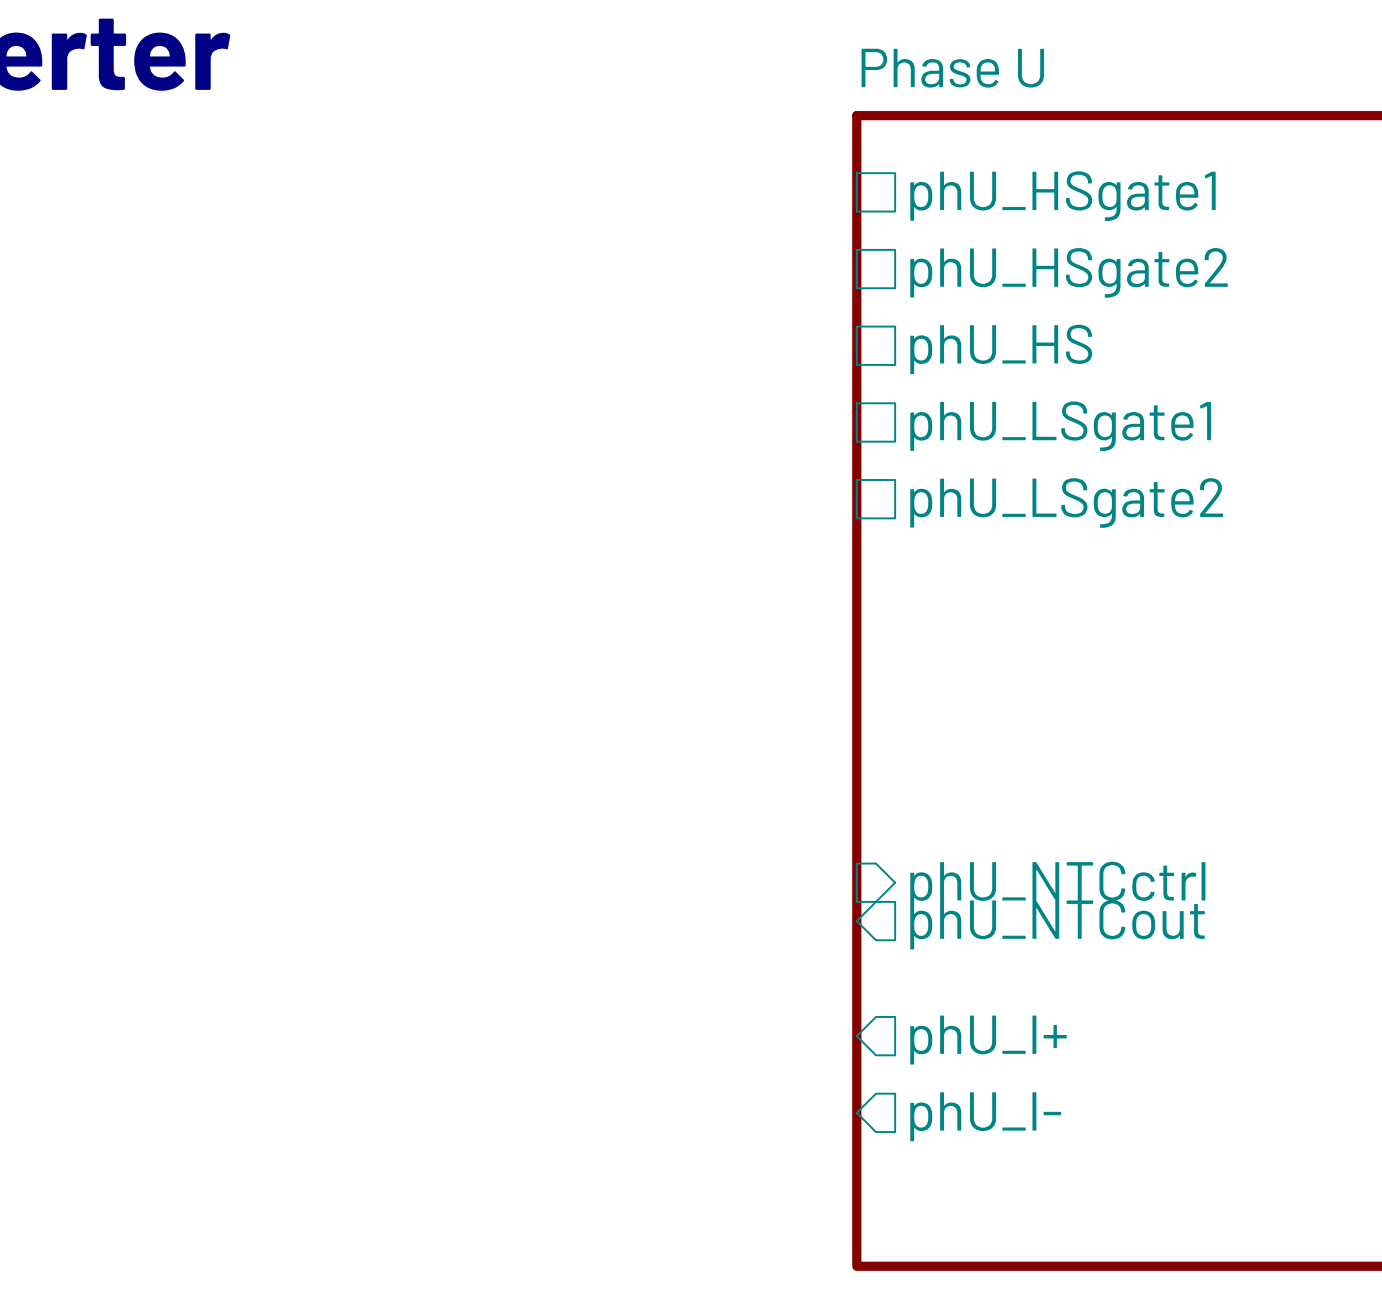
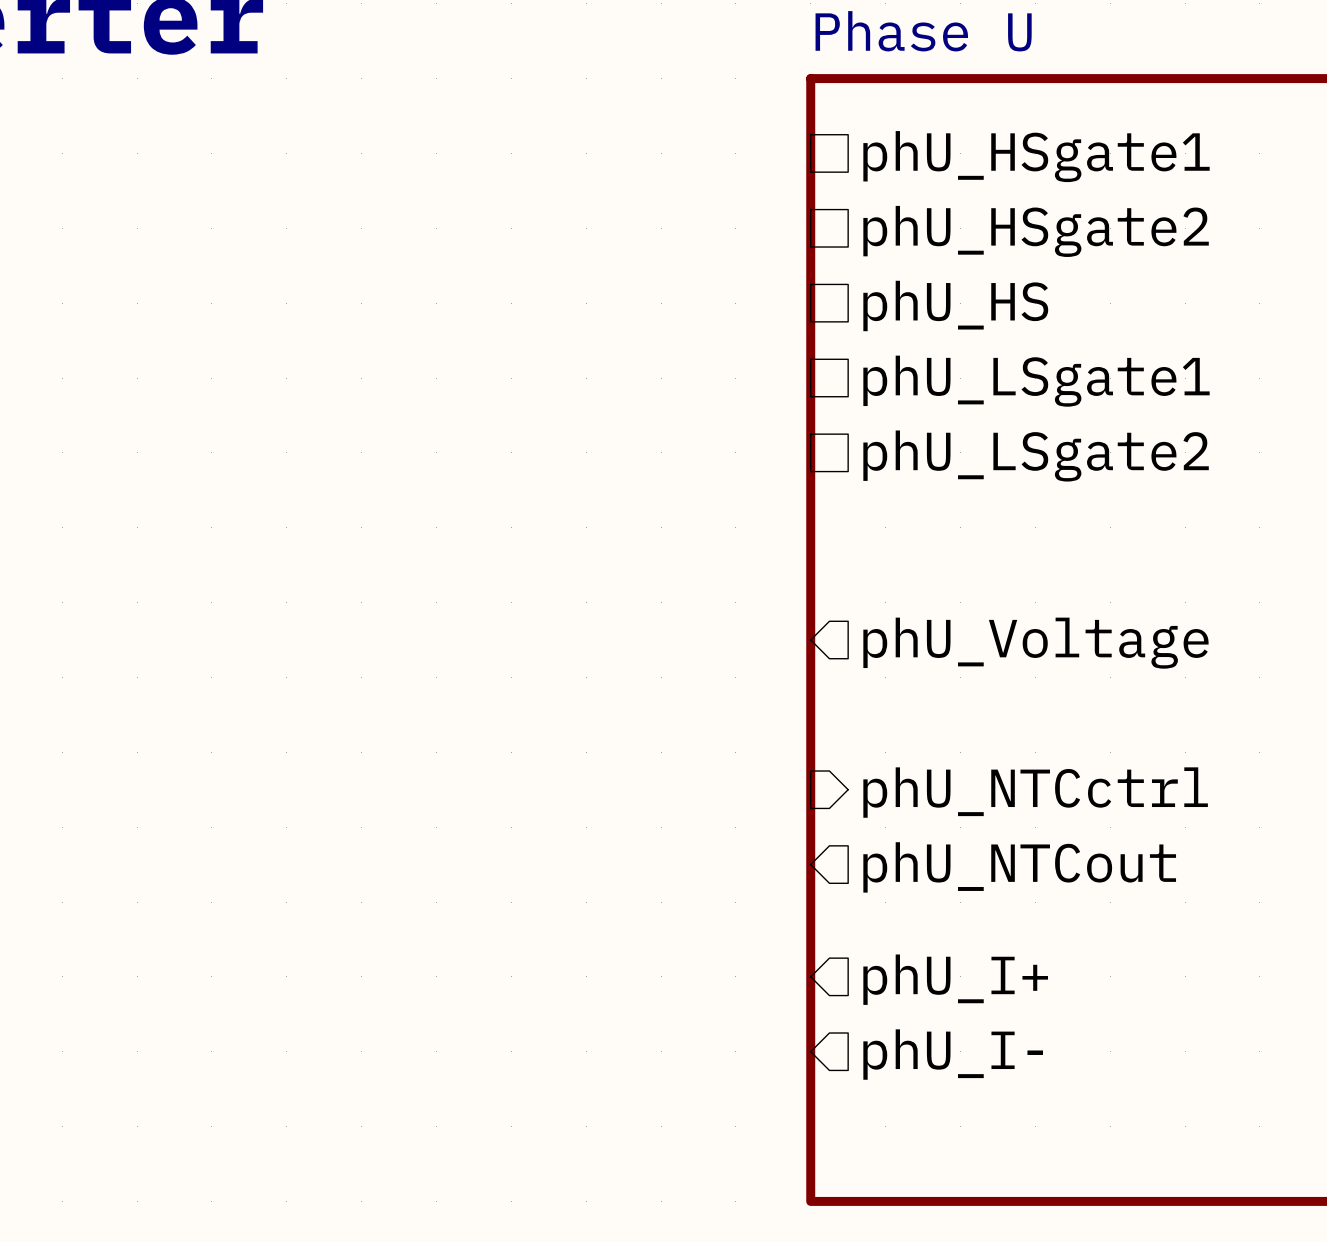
sheet pin: none -> phU_Voltage (1035, 643)
sheet pin position: phU_NTCctrl (1057, 886) -> phU_NTCctrl (1035, 792)

